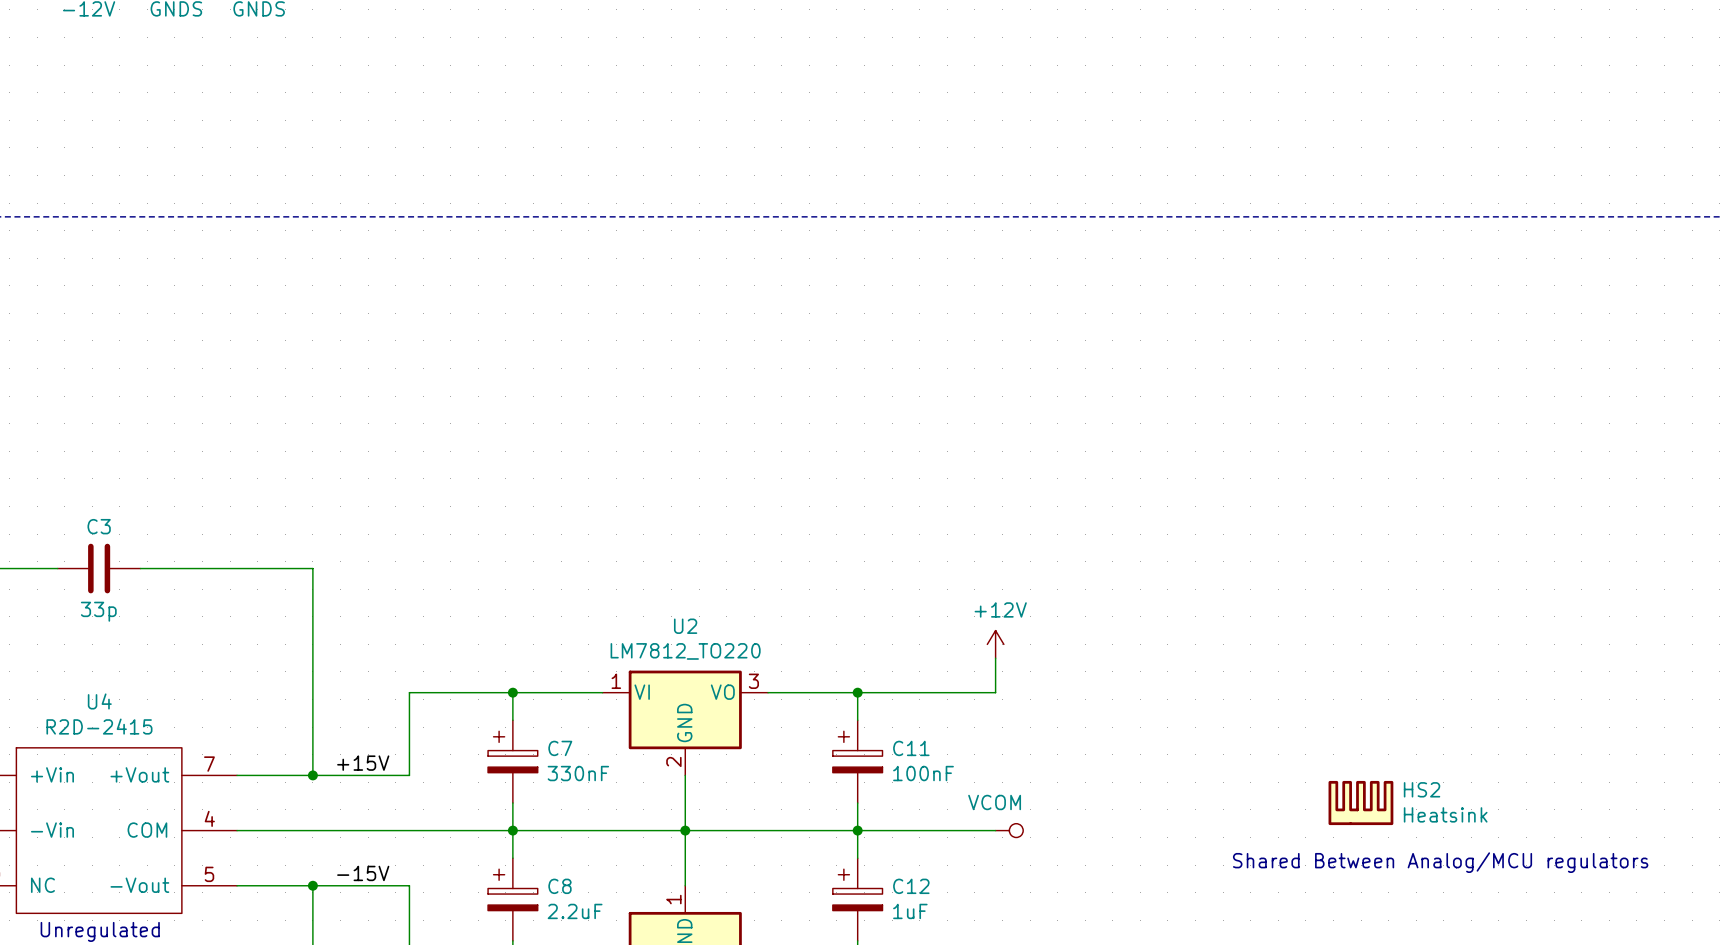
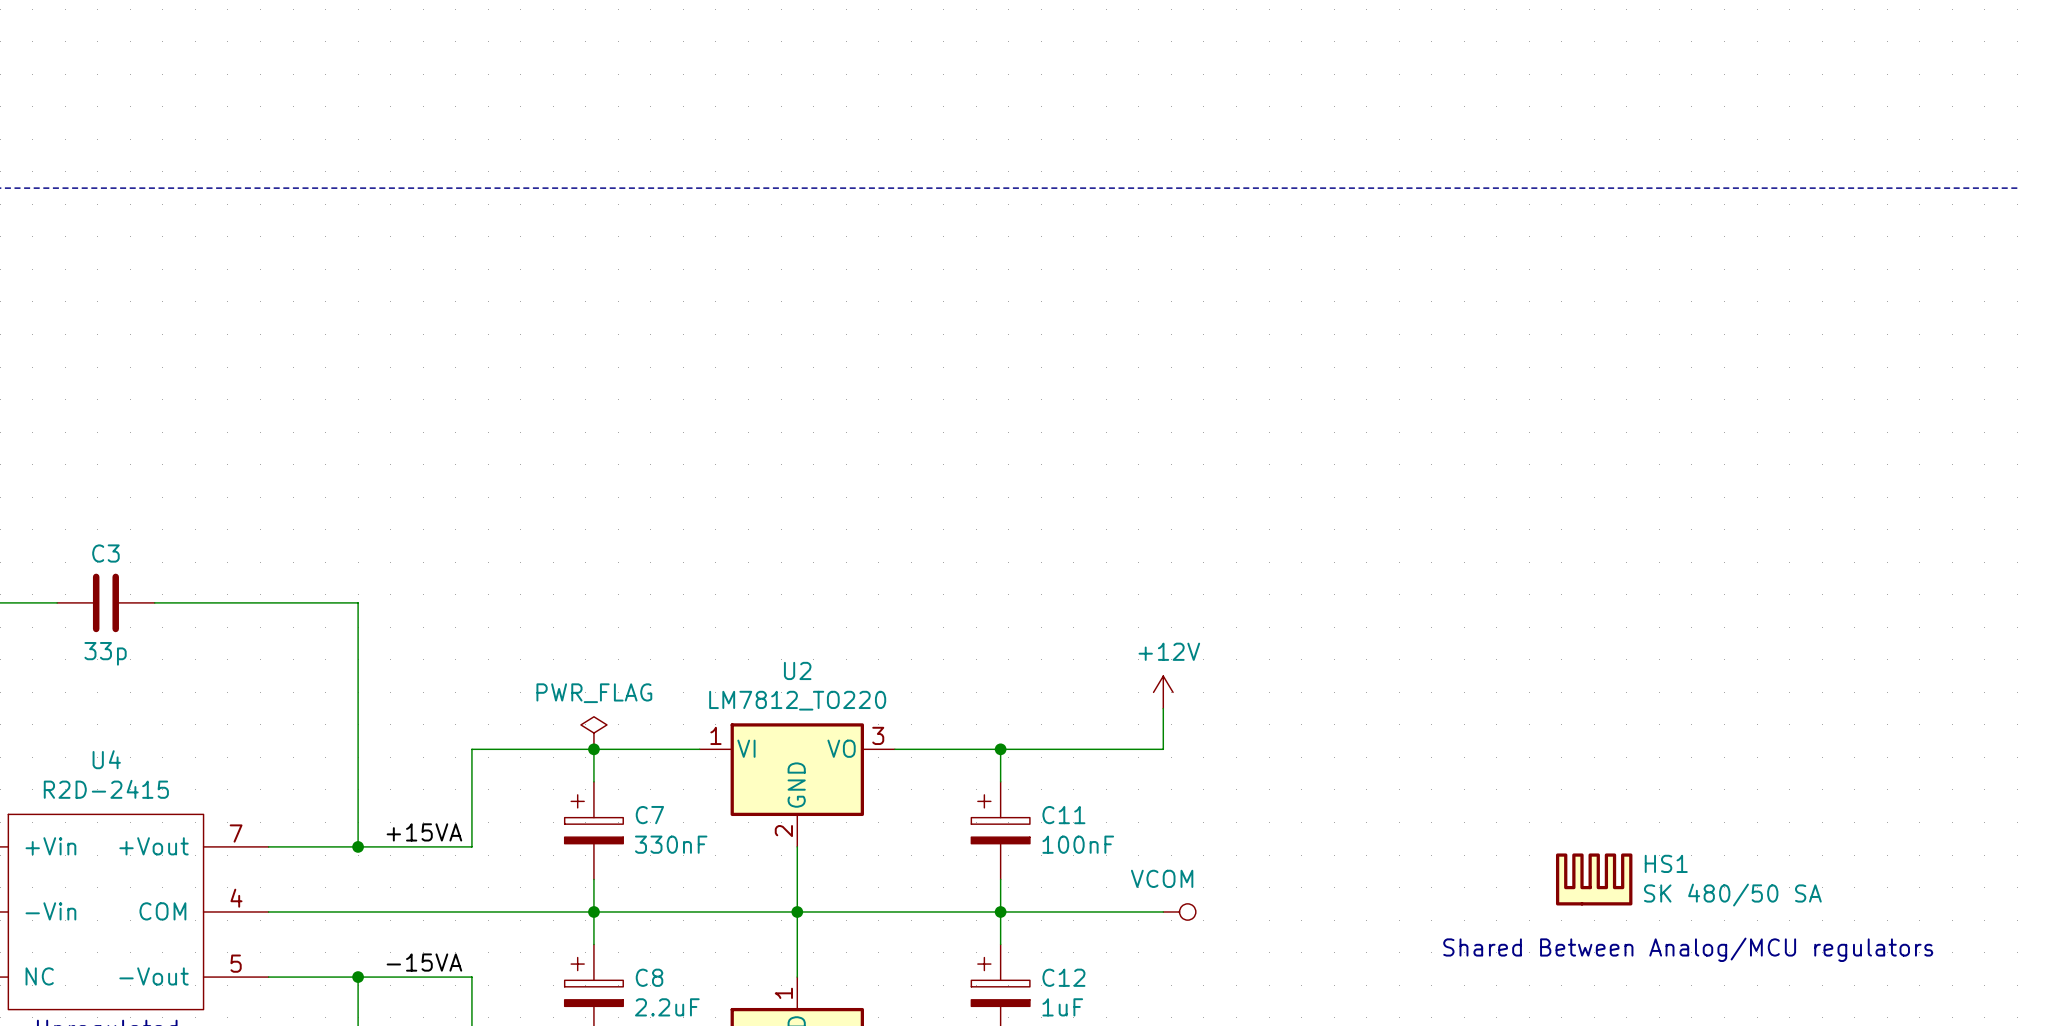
power symbol: none -> PWR_FLAG (593, 733)
label: +15V (363, 763) -> +15VA (424, 832)
HS2 name: HS2 (1422, 789) -> HS1 (1666, 863)
HS2 value: Heatsink (1445, 814) -> SK 480/50 SA (1732, 895)
label: -15V (363, 873) -> -15VA (424, 962)

